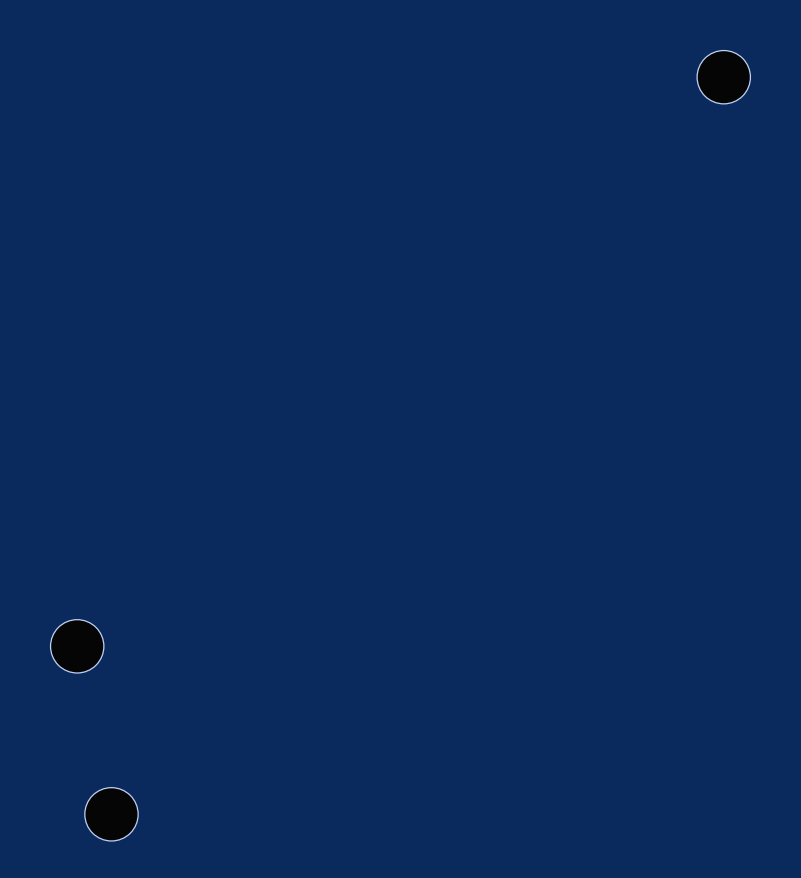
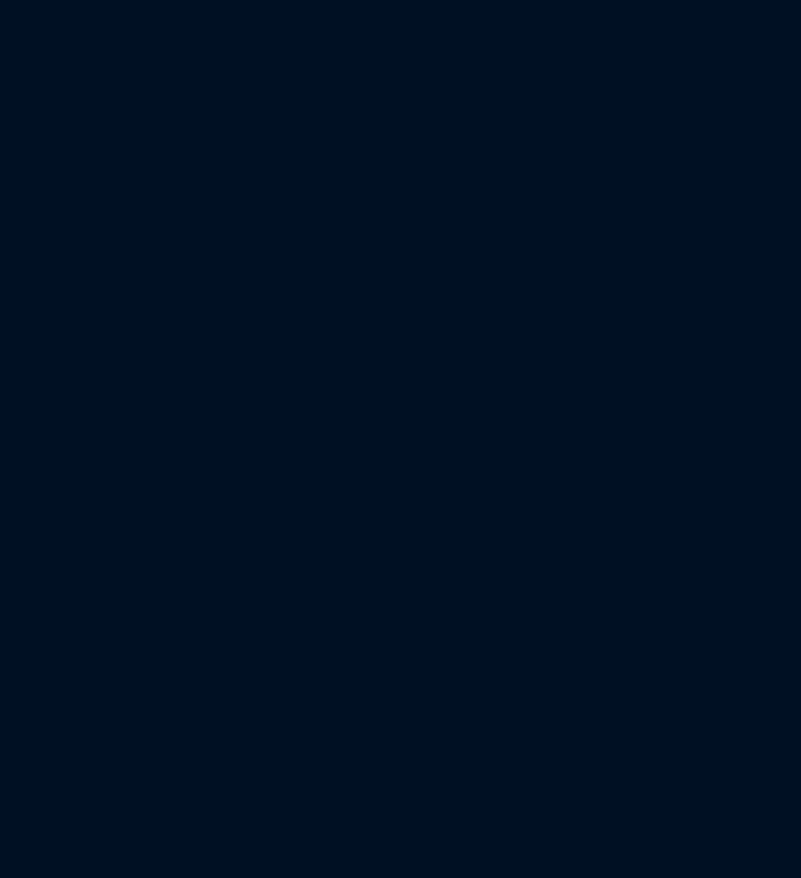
part: (723, 77) -> none
part: (77, 646) -> none
part: (111, 814) -> none

